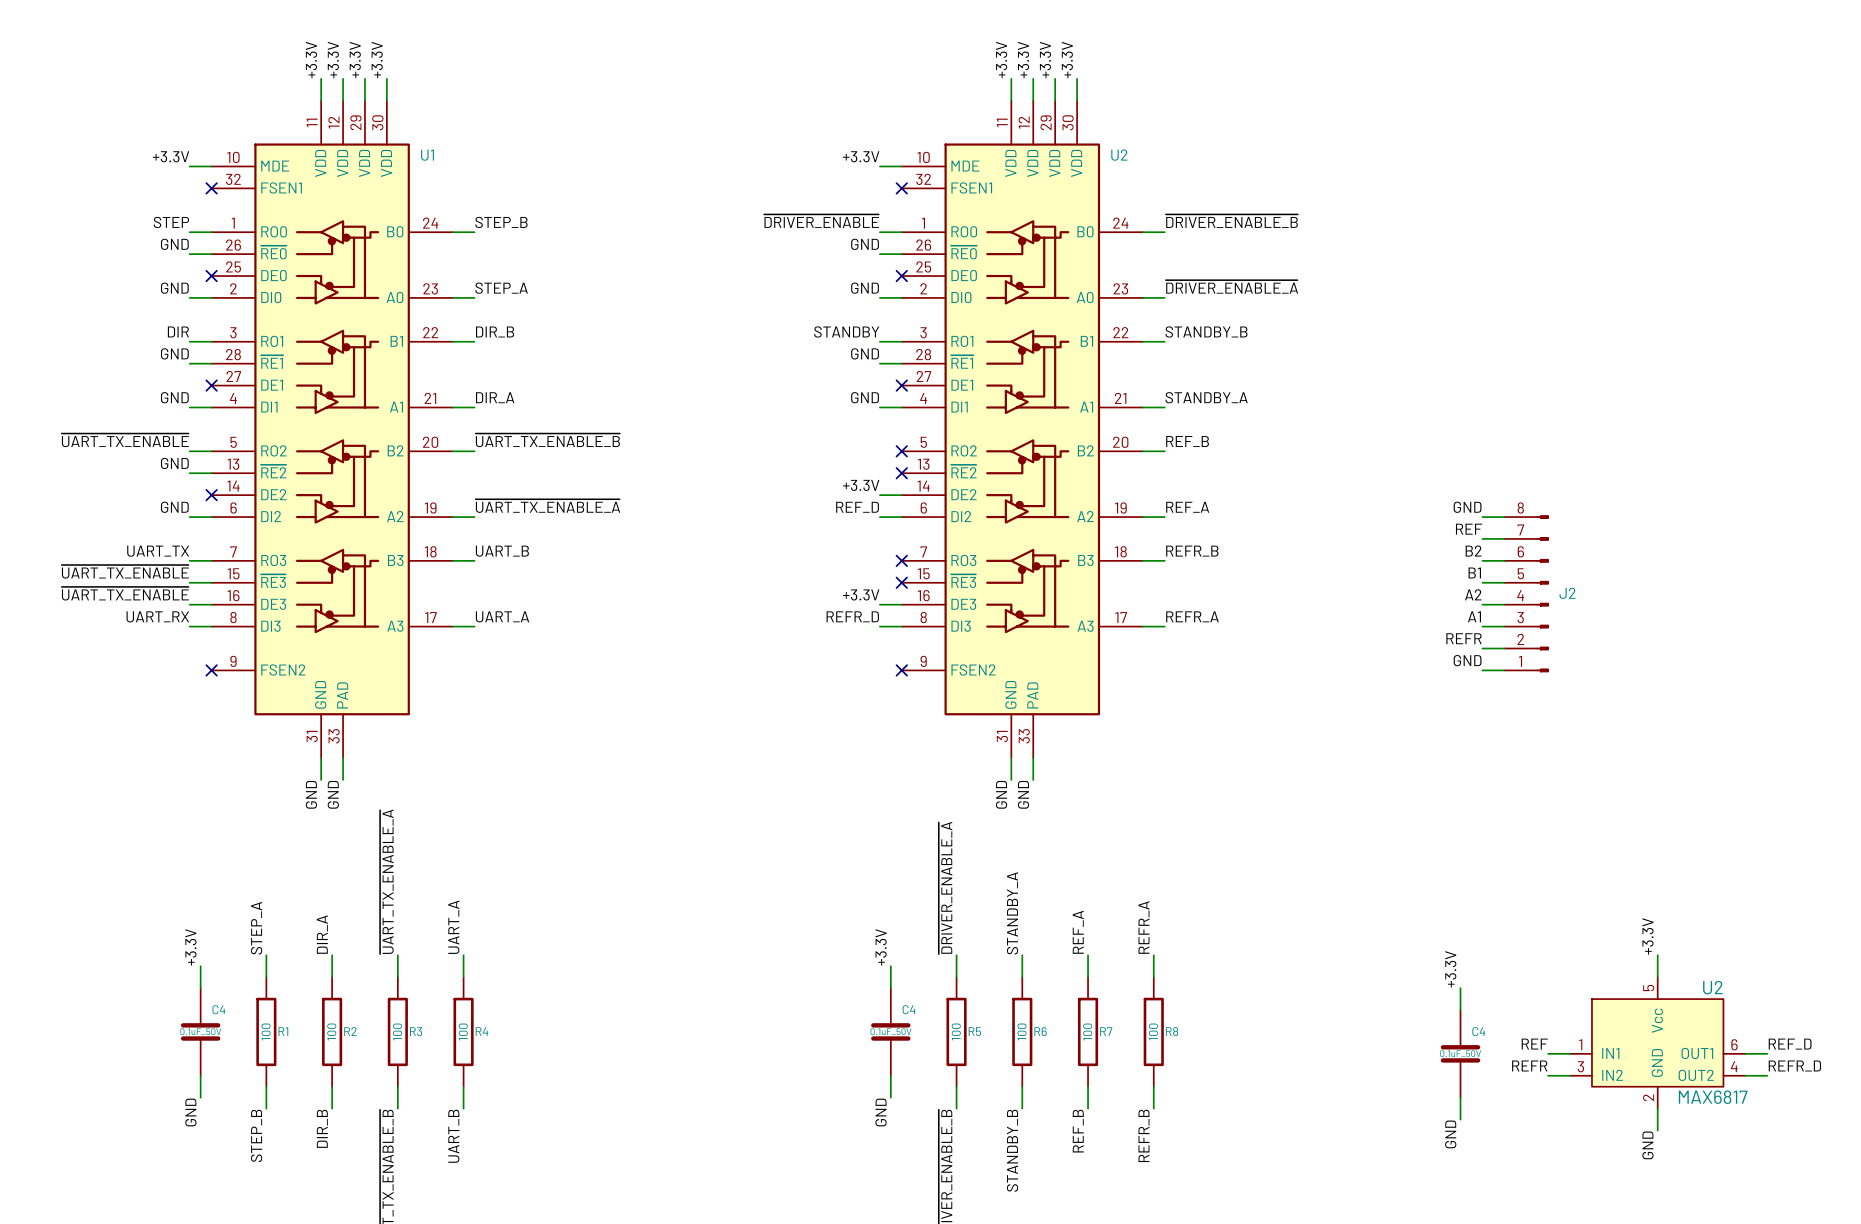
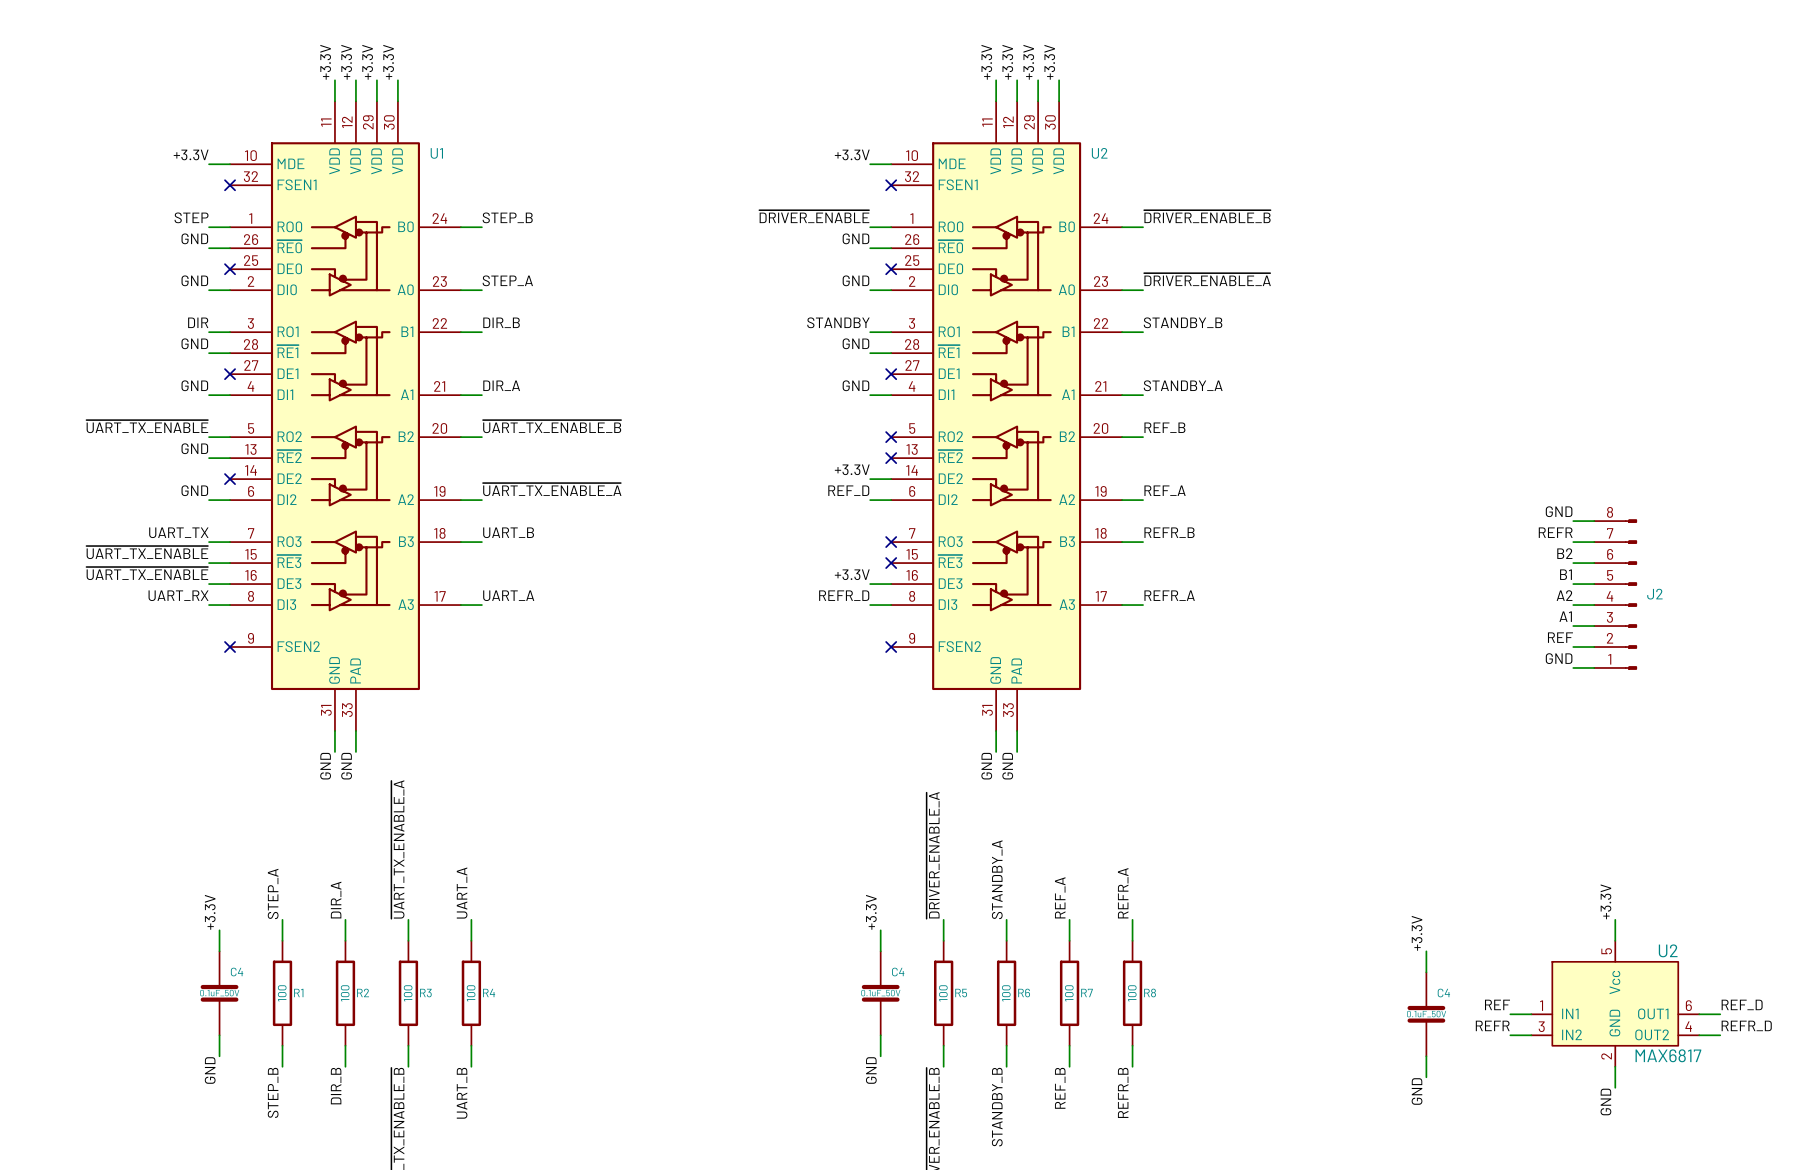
label: GND (1467, 507) -> none
wire: (1482, 517) (1504, 517) -> (1573, 521) (1594, 521)
label position: REF (1469, 529) -> REF (1560, 637)
label: none -> GND (1559, 511)
wire: (1482, 538) (1504, 538) -> (1573, 542) (1594, 542)
label position: B2 (1473, 551) -> B2 (1564, 553)
wire: (1482, 560) (1504, 560) -> (1573, 563) (1594, 563)
label position: B1 (1474, 573) -> B1 (1565, 574)
wire: (1482, 582) (1504, 582) -> (1573, 584) (1594, 584)
J2 position: (1526, 593) -> (1615, 594)
label position: A2 (1473, 594) -> A2 (1564, 595)
wire: (1482, 604) (1504, 604) -> (1573, 605) (1594, 605)
label position: A1 (1474, 616) -> A1 (1565, 616)
wire: (1482, 626) (1504, 626) -> (1573, 626) (1594, 626)
label position: REFR (1464, 638) -> REFR (1555, 532)
wire: (1482, 648) (1504, 648) -> (1573, 647) (1594, 647)
label: GND (1467, 660) -> none
wire: (1482, 670) (1504, 670) -> (1573, 667) (1594, 667)
label: none -> GND (1559, 658)

